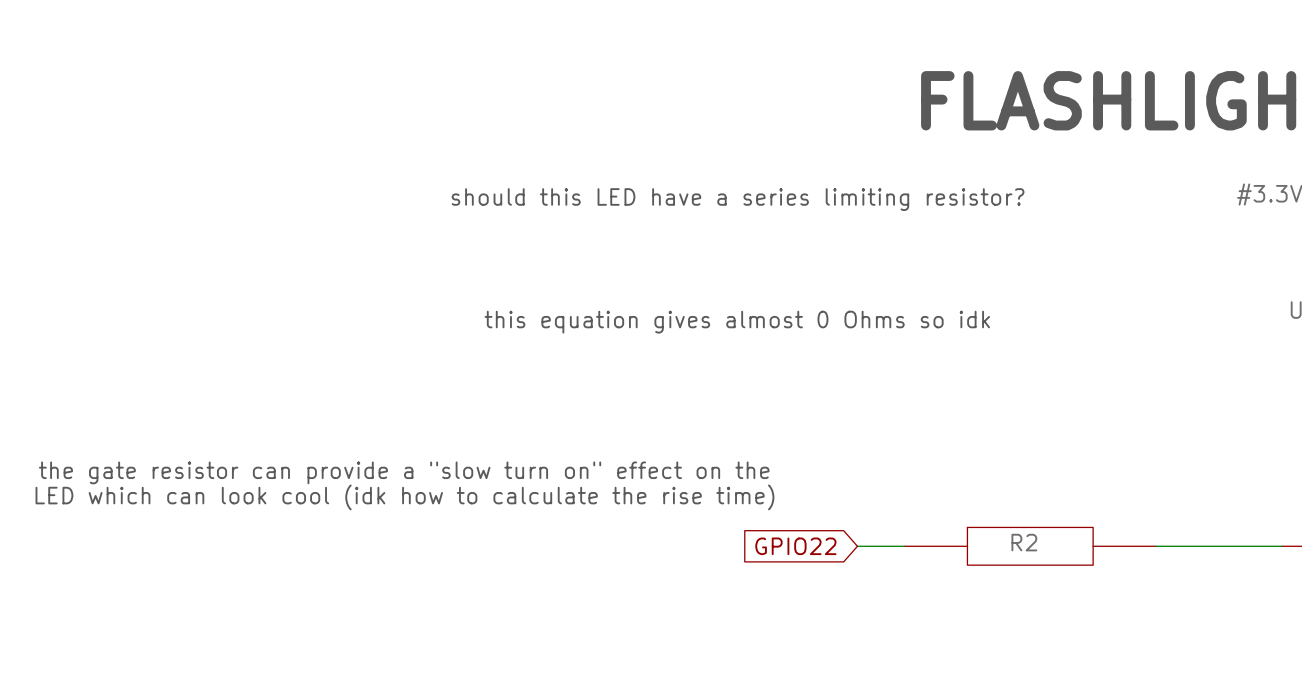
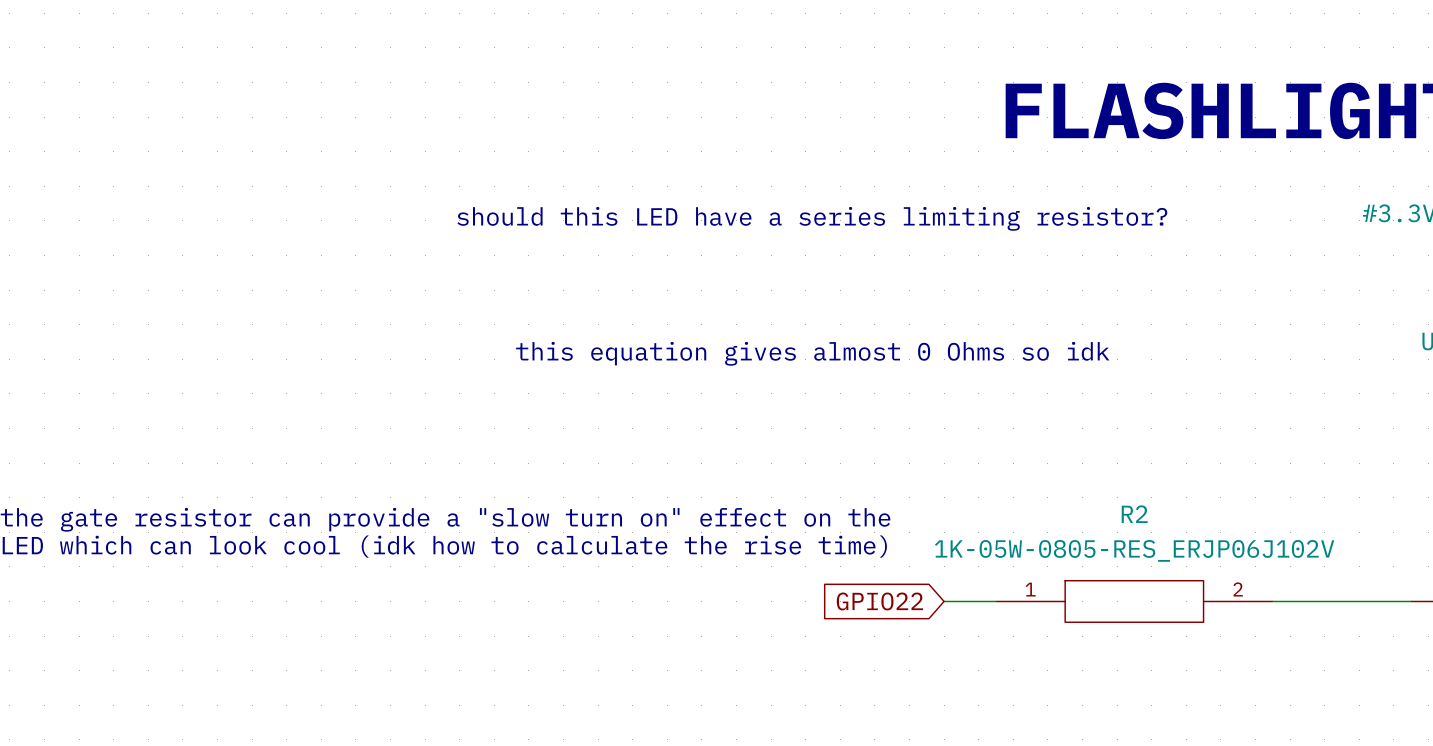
R2 value: none -> 1K-05W-0805-RES_ERJP06J102V (1134, 550)
R2 pin number: none -> 1 (1030, 589)
R2 pin number: none -> 2 (1238, 589)
R2 name position: R2 (1024, 542) -> R2 (1134, 514)

